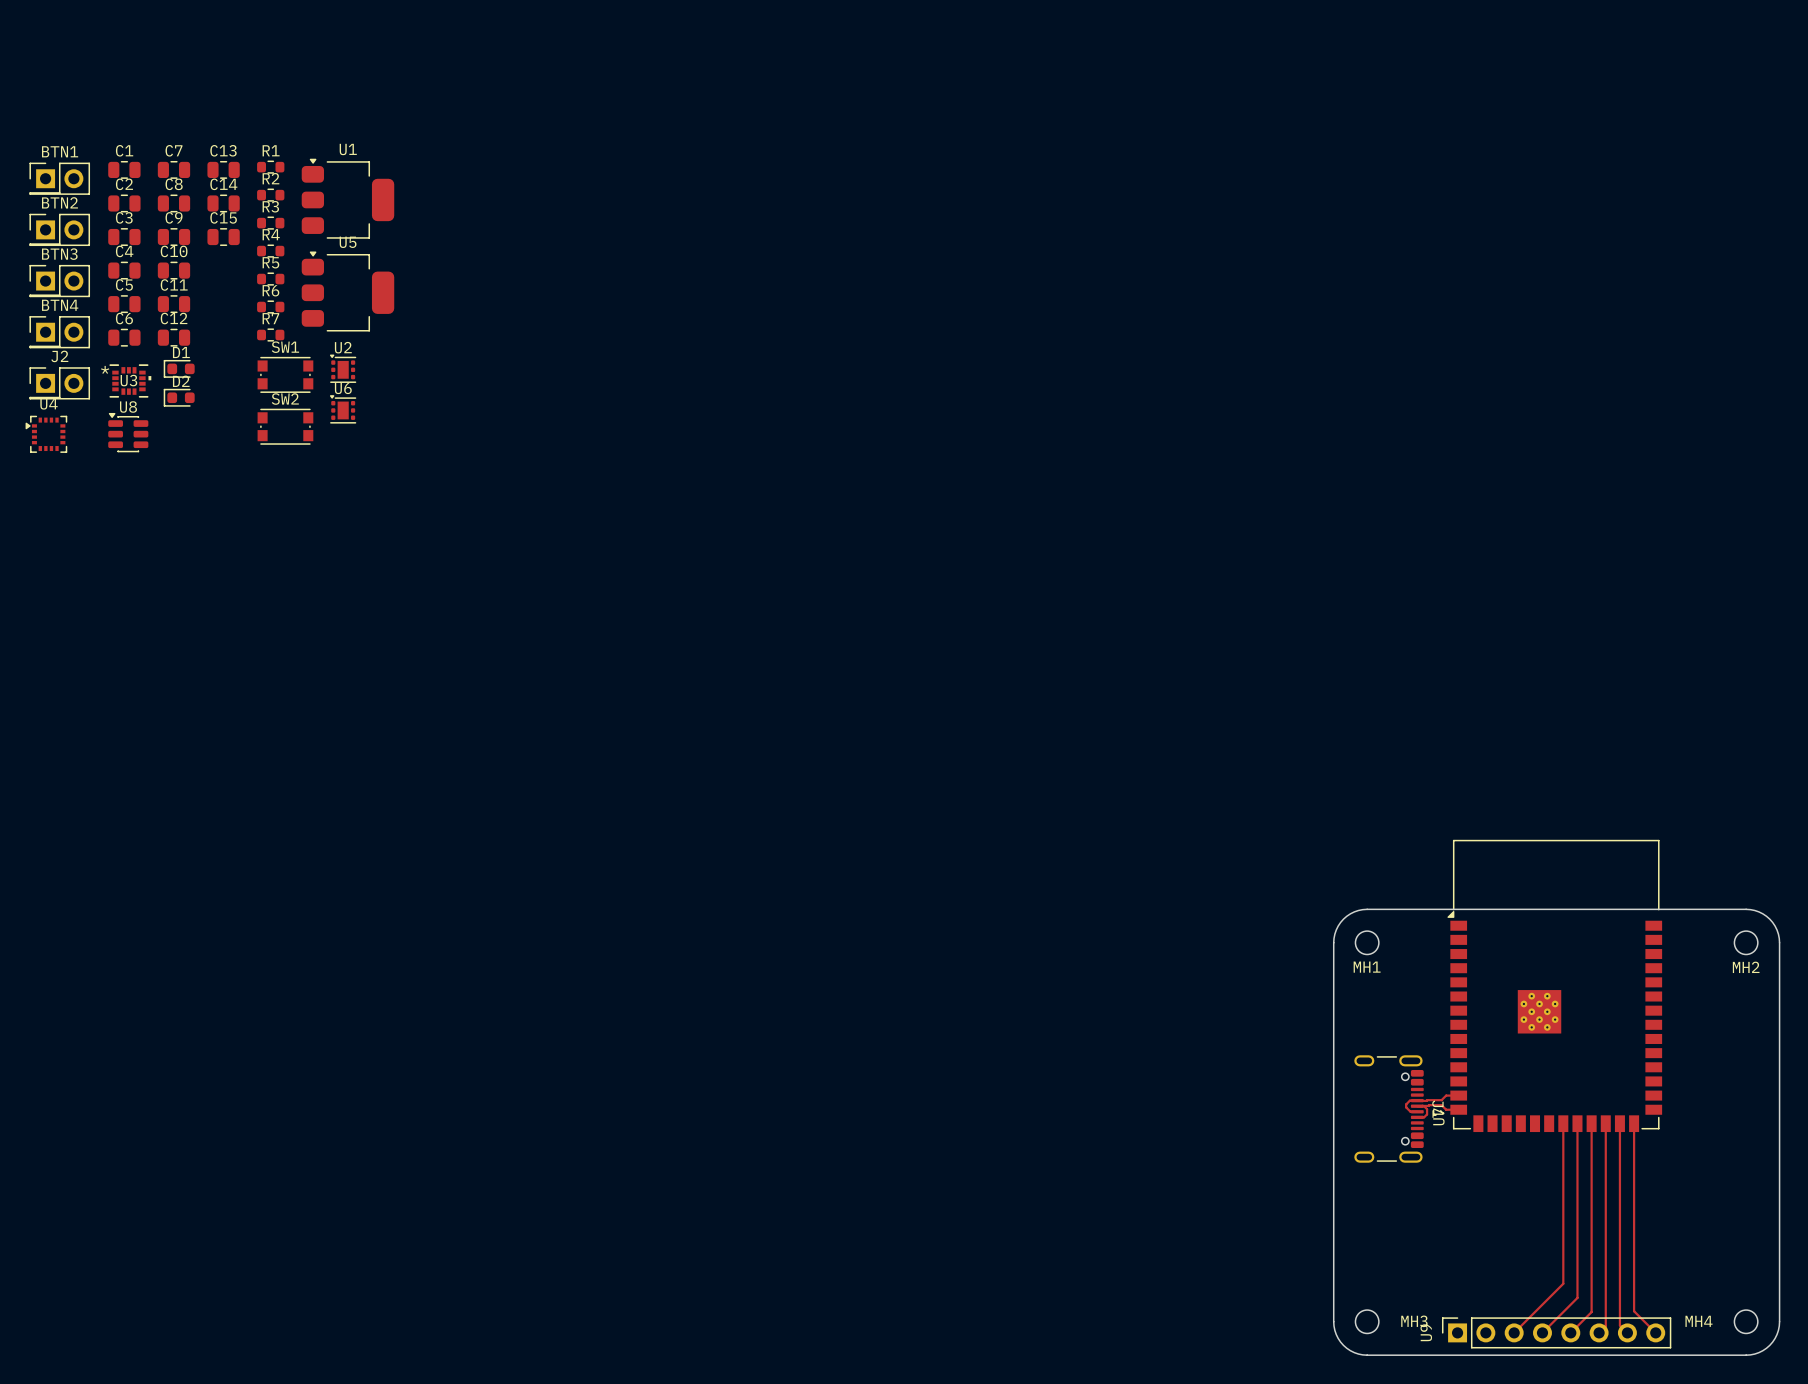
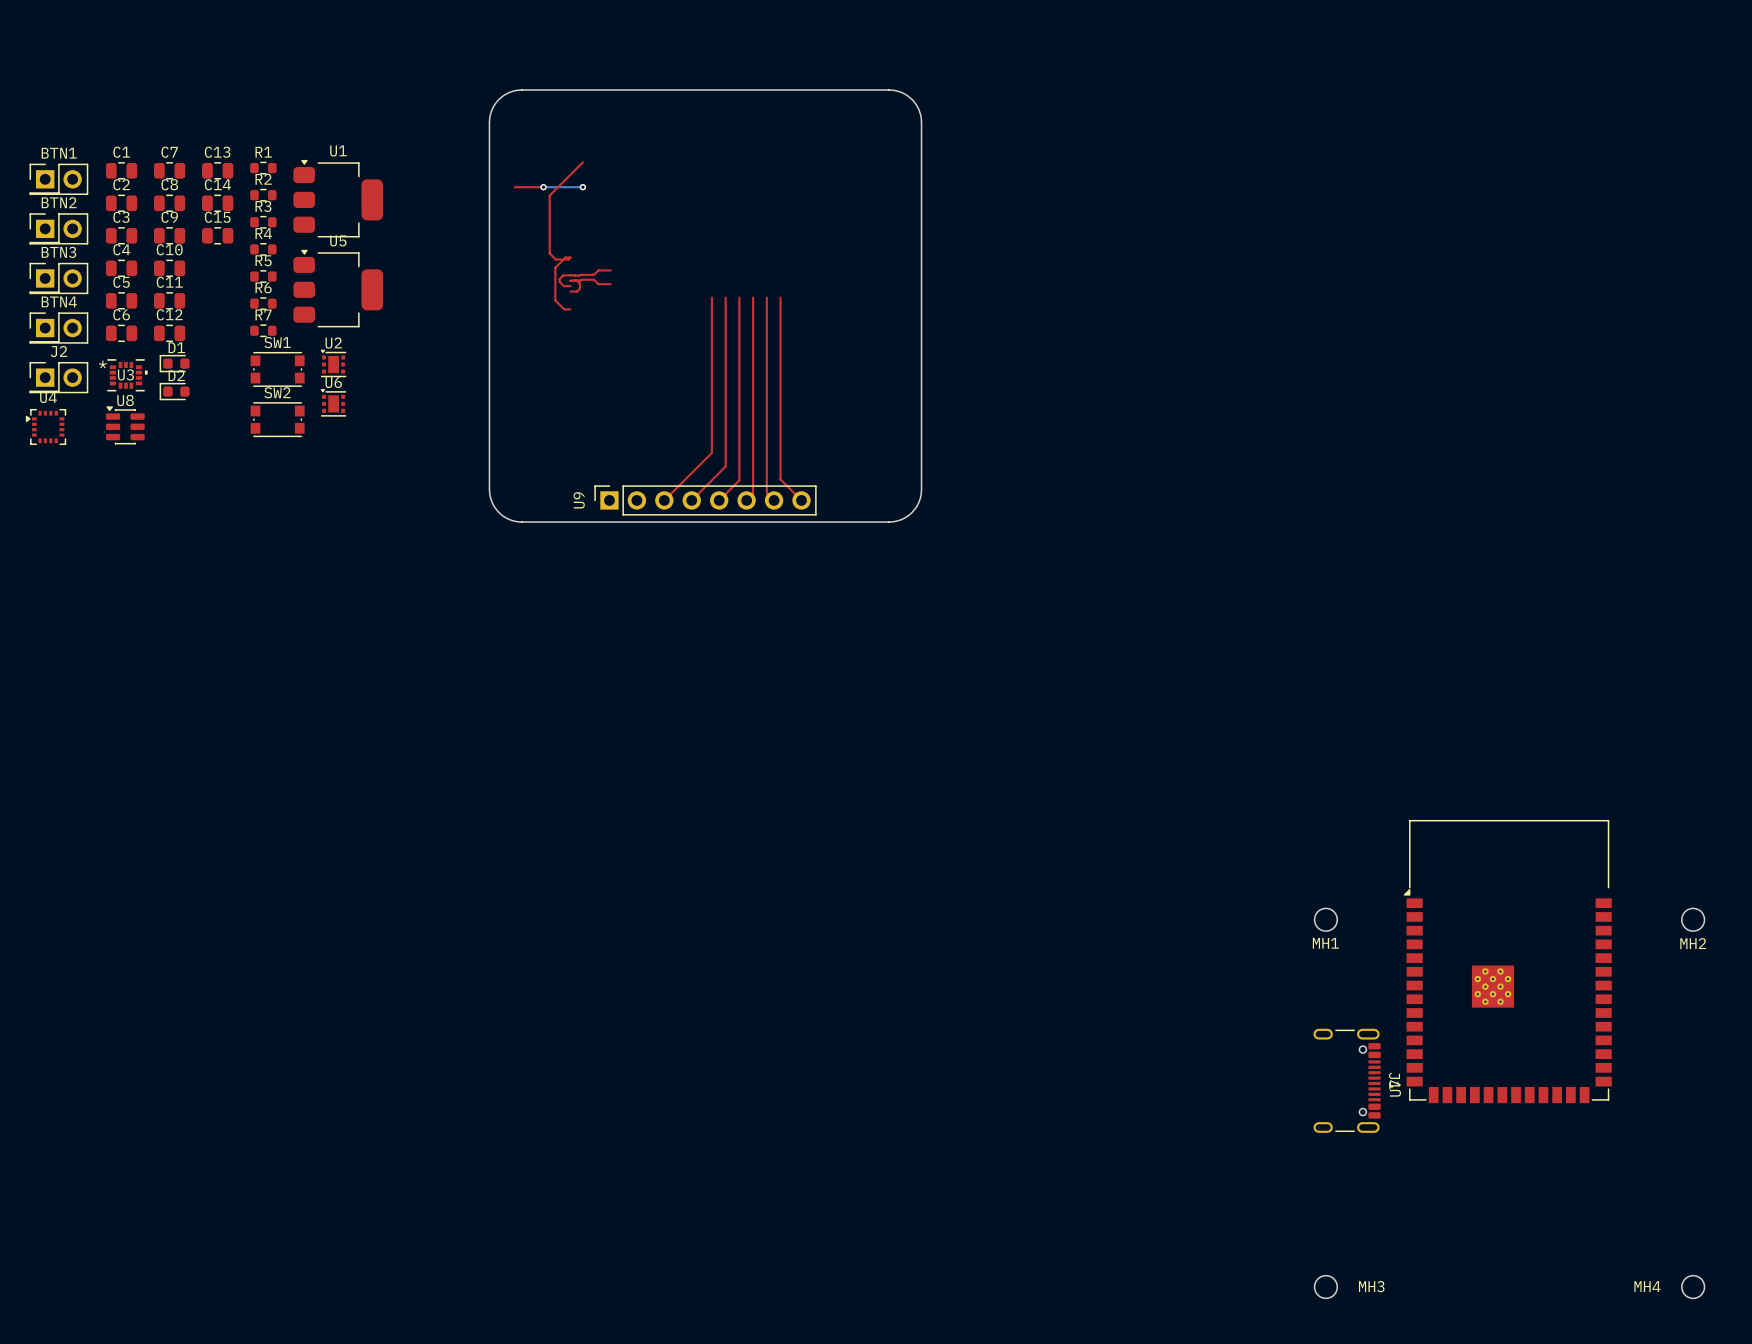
board edge: none -> (521, 89) (889, 89) (901, 92) (912, 99) (919, 109) (921, 122) (921, 489) (919, 502) (912, 512) (901, 519) (889, 522) (521, 522) (509, 519) (498, 512) (491, 502) (489, 489) (489, 122) (491, 109) (498, 99) (509, 92) (521, 89)
top track: none -> (582, 162) (549, 195) (549, 253) (555, 259) (568, 259) (570, 257) (565, 257) (555, 267) (555, 300) (564, 309) (570, 309)
top track: none -> (514, 187) (543, 187)
bottom track: none -> (543, 187) (582, 187)
via: none -> (543, 187)
via: none -> (582, 187)
top track: none -> (610, 270) (598, 270) (594, 274) (563, 275) (559, 281) (563, 286) (570, 286)
top track: none -> (570, 280) (577, 280) (579, 283) (579, 288) (577, 291) (570, 291)
top track: none -> (575, 280) (594, 279) (598, 284) (610, 284)
top track: none -> (711, 297) (711, 452) (664, 500)
top track: none -> (725, 297) (725, 466) (691, 500)
top track: none -> (739, 297) (739, 480) (719, 500)
top track: none -> (753, 297) (753, 493) (746, 500)
top track: none -> (766, 297) (766, 493) (774, 500)
top track: none -> (780, 297) (780, 479) (801, 500)
board edge: (1367, 909) (1746, 909) (1758, 911) (1769, 919) (1777, 929) (1779, 942) (1779, 1321) (1777, 1334) (1769, 1345) (1758, 1352) (1746, 1355) (1367, 1355) (1354, 1352) (1343, 1345) (1336, 1334) (1333, 1321) (1333, 942) (1336, 929) (1343, 919) (1354, 911) (1367, 909) -> none
top track: (1458, 1095) (1446, 1095) (1441, 1100) (1409, 1100) (1406, 1107) (1410, 1111) (1417, 1111) -> none
top track: (1417, 1106) (1424, 1106) (1427, 1109) (1427, 1114) (1424, 1117) (1417, 1117) -> none
top track: (1422, 1106) (1441, 1105) (1446, 1109) (1458, 1109) -> none
top track: (1563, 1123) (1563, 1283) (1514, 1332) -> none
top track: (1577, 1123) (1577, 1297) (1542, 1332) -> none
top track: (1591, 1123) (1591, 1312) (1570, 1332) -> none
top track: (1605, 1123) (1605, 1326) (1599, 1332) -> none
top track: (1619, 1123) (1619, 1325) (1627, 1332) -> none
top track: (1634, 1123) (1634, 1311) (1655, 1332) -> none
U9 position: (1556, 1332) -> (705, 500)

